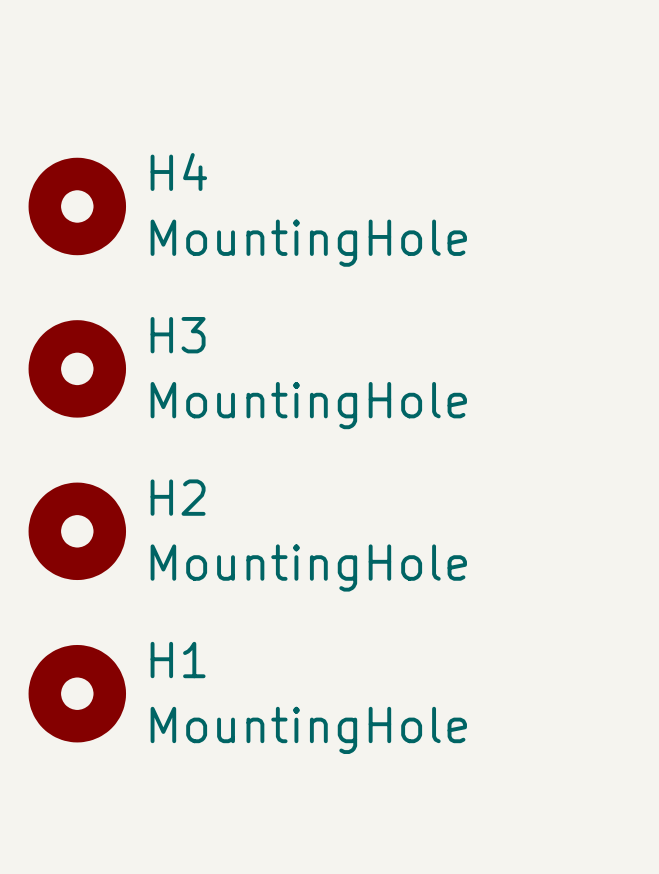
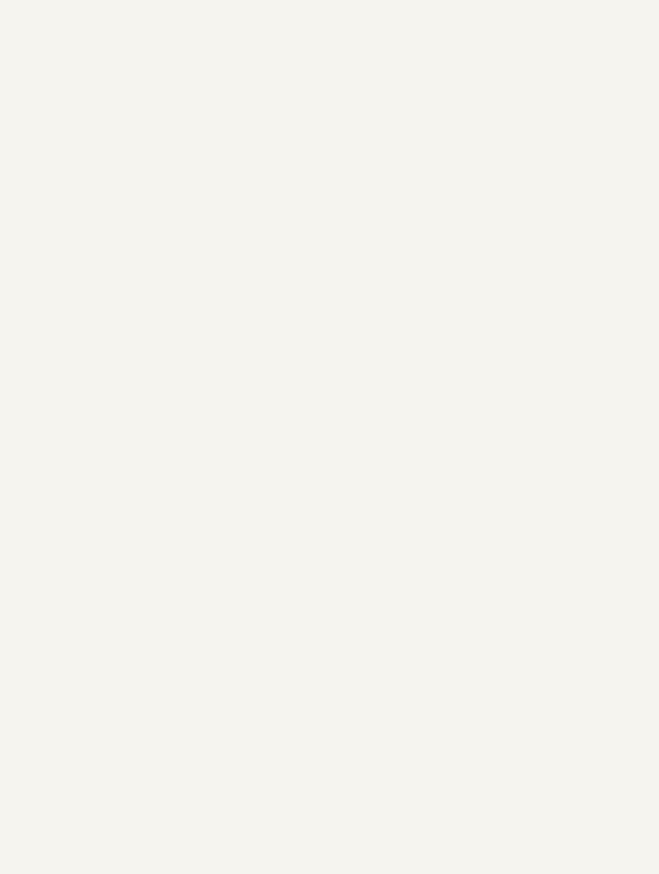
H4: MountingHole (77, 206) -> none
H3: MountingHole (77, 368) -> none
H2: MountingHole (77, 531) -> none
H1: MountingHole (77, 693) -> none

